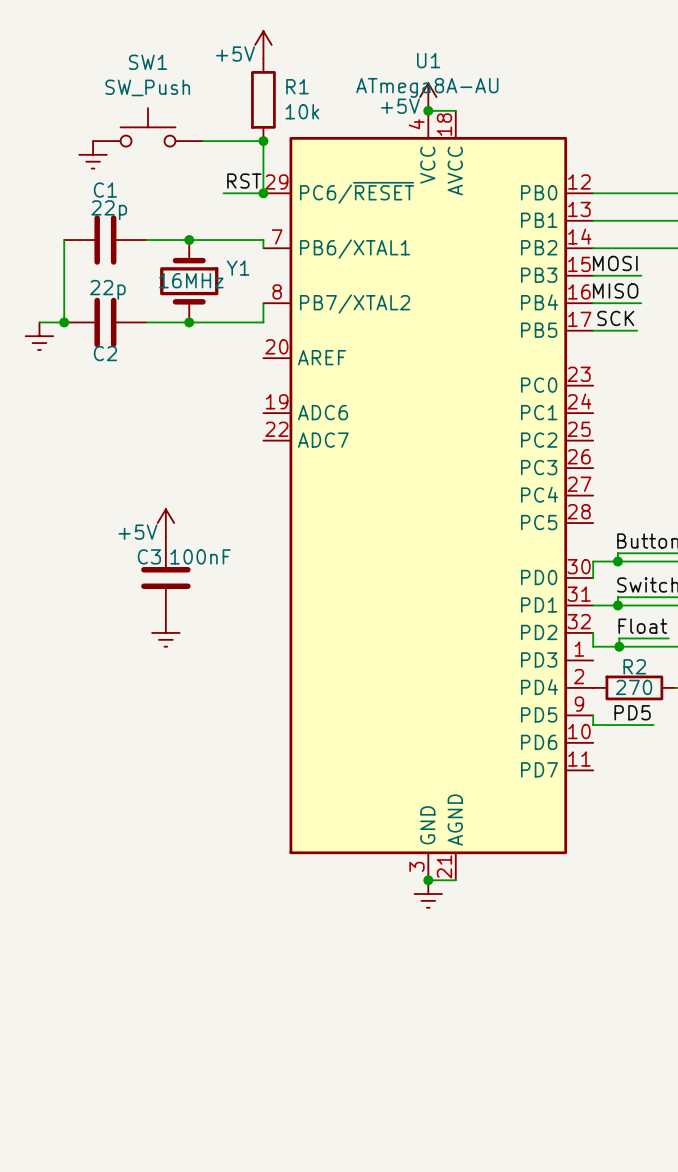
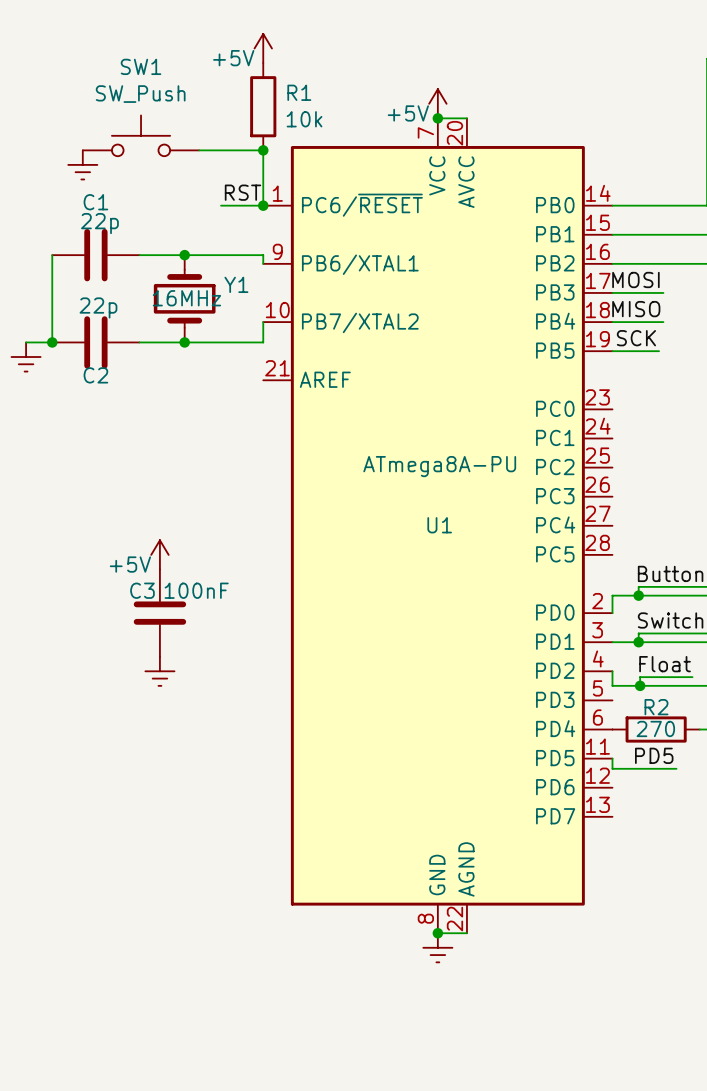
U1 name position: U1 (428, 60) -> U1 (439, 525)
U1 value: ATmega8A-AU (427, 87) -> ATmega8A-PU (439, 466)
U1 symbol: [263, 110, 594, 881] -> [263, 118, 613, 934]

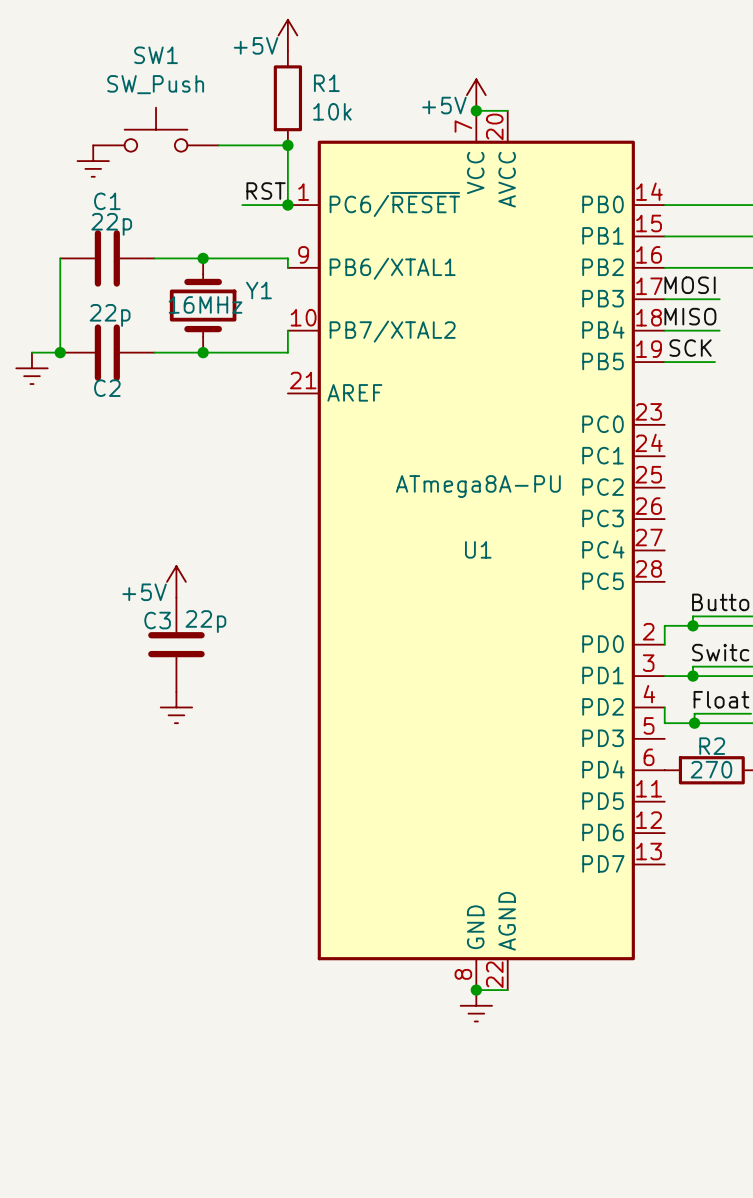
C3 value: 100nF (196, 590) -> 22p (205, 621)
label: PD5 (654, 755) -> none
wire: (612, 758) (612, 768) (676, 768) -> none

